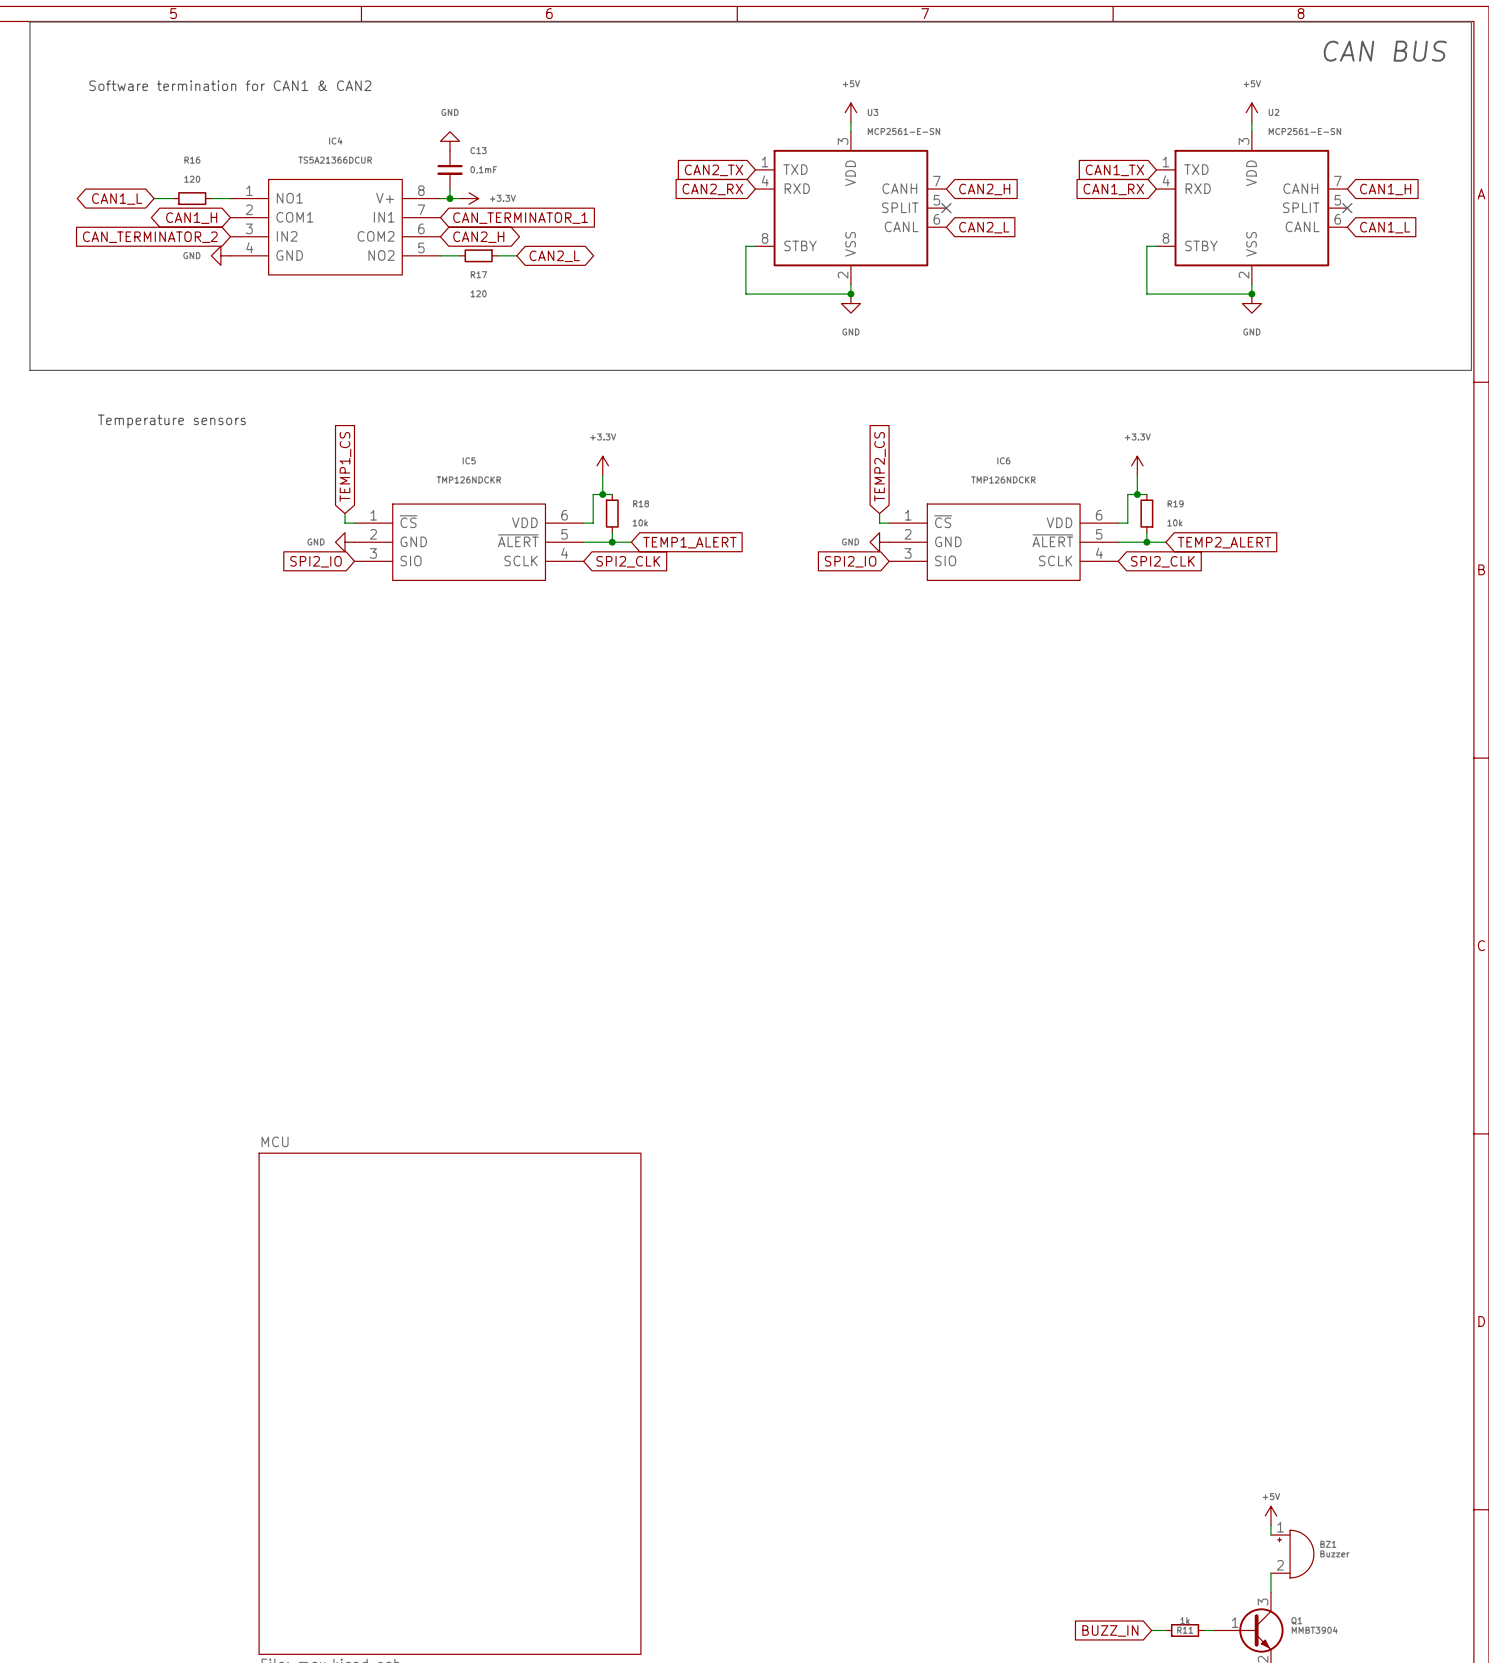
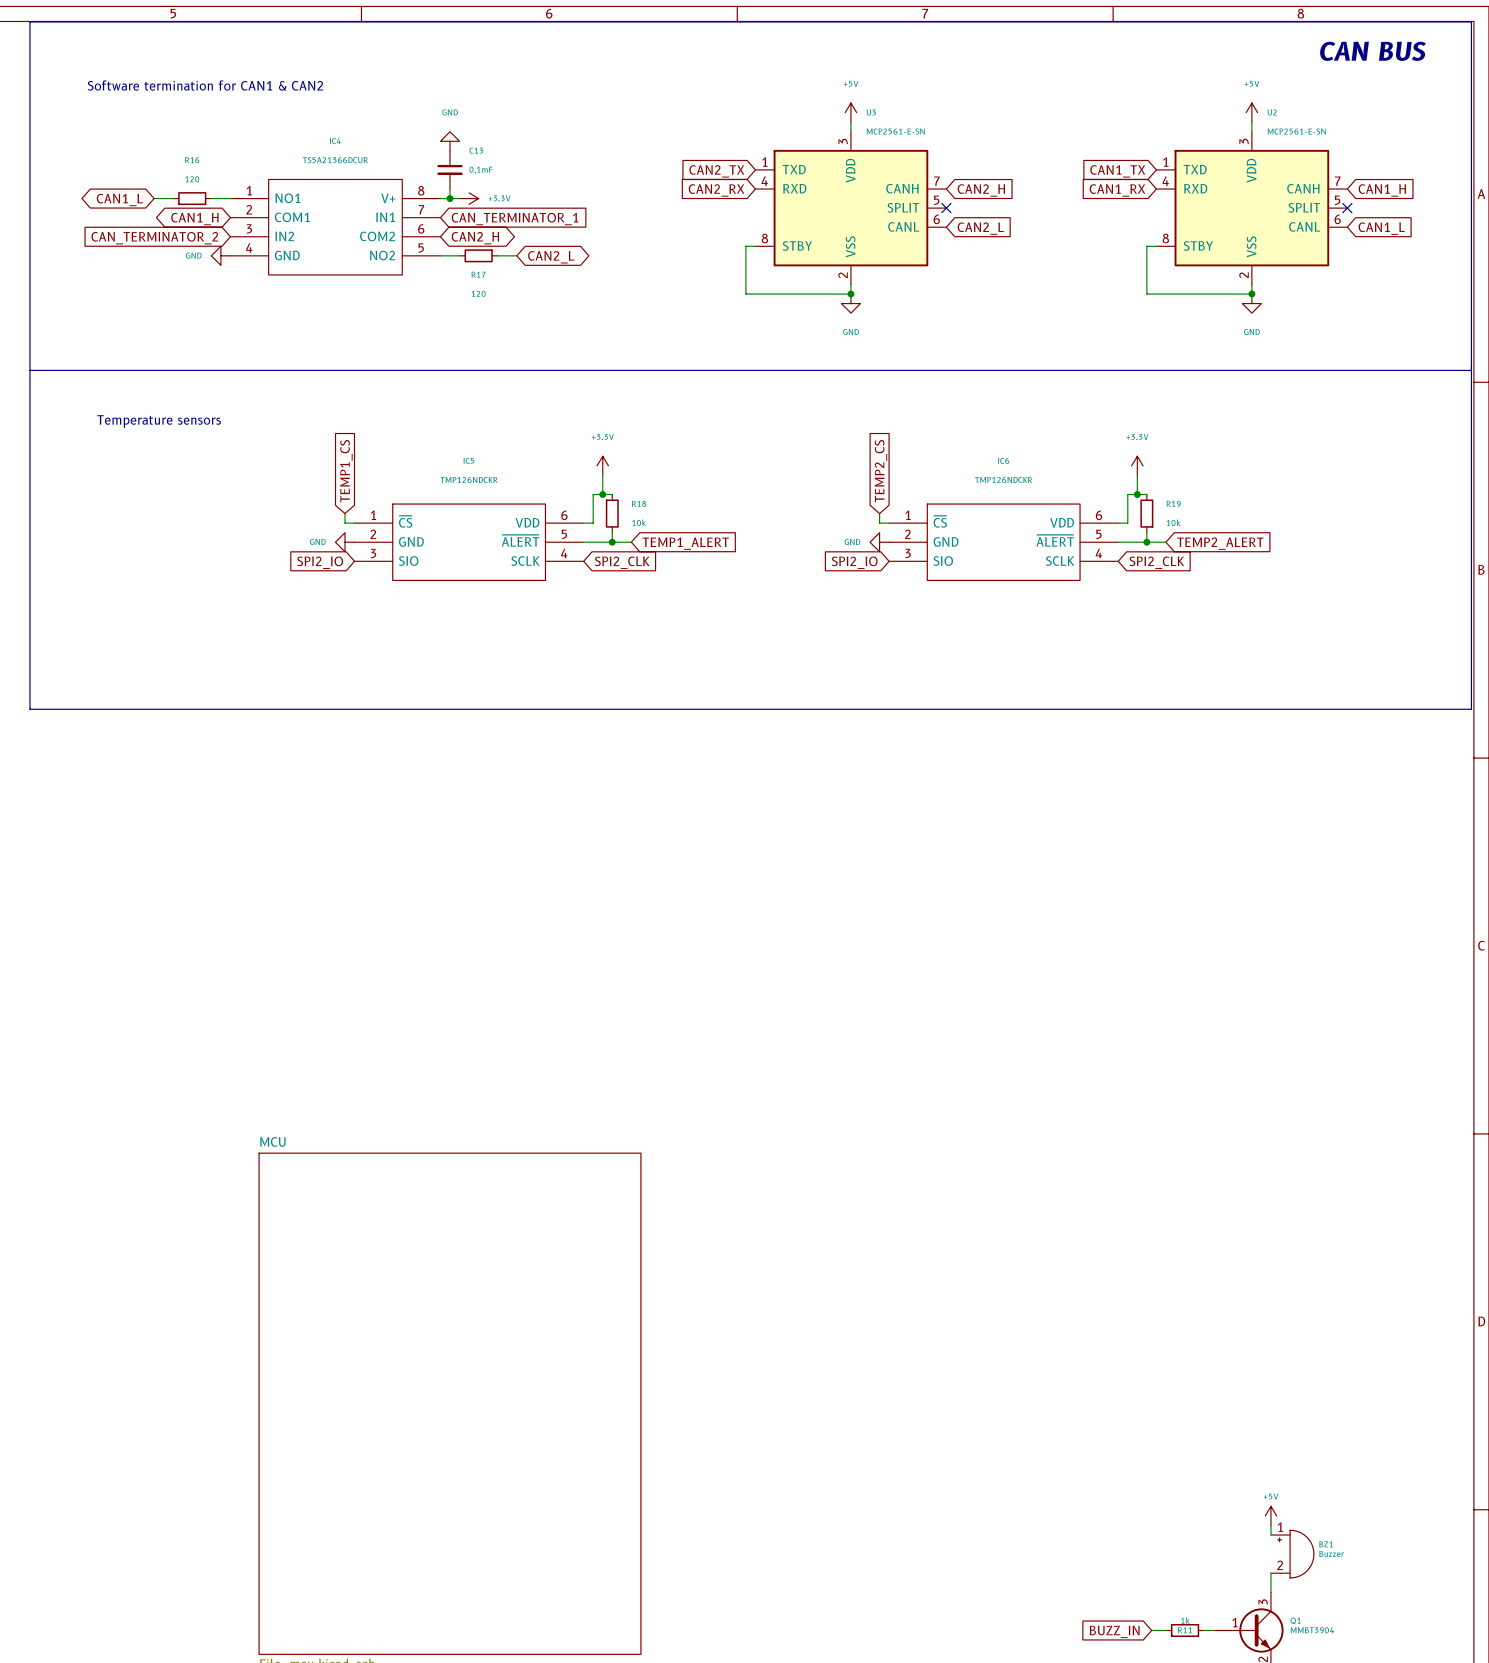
line: none -> (29, 370) (29, 709) (1471, 709) (1471, 370)

